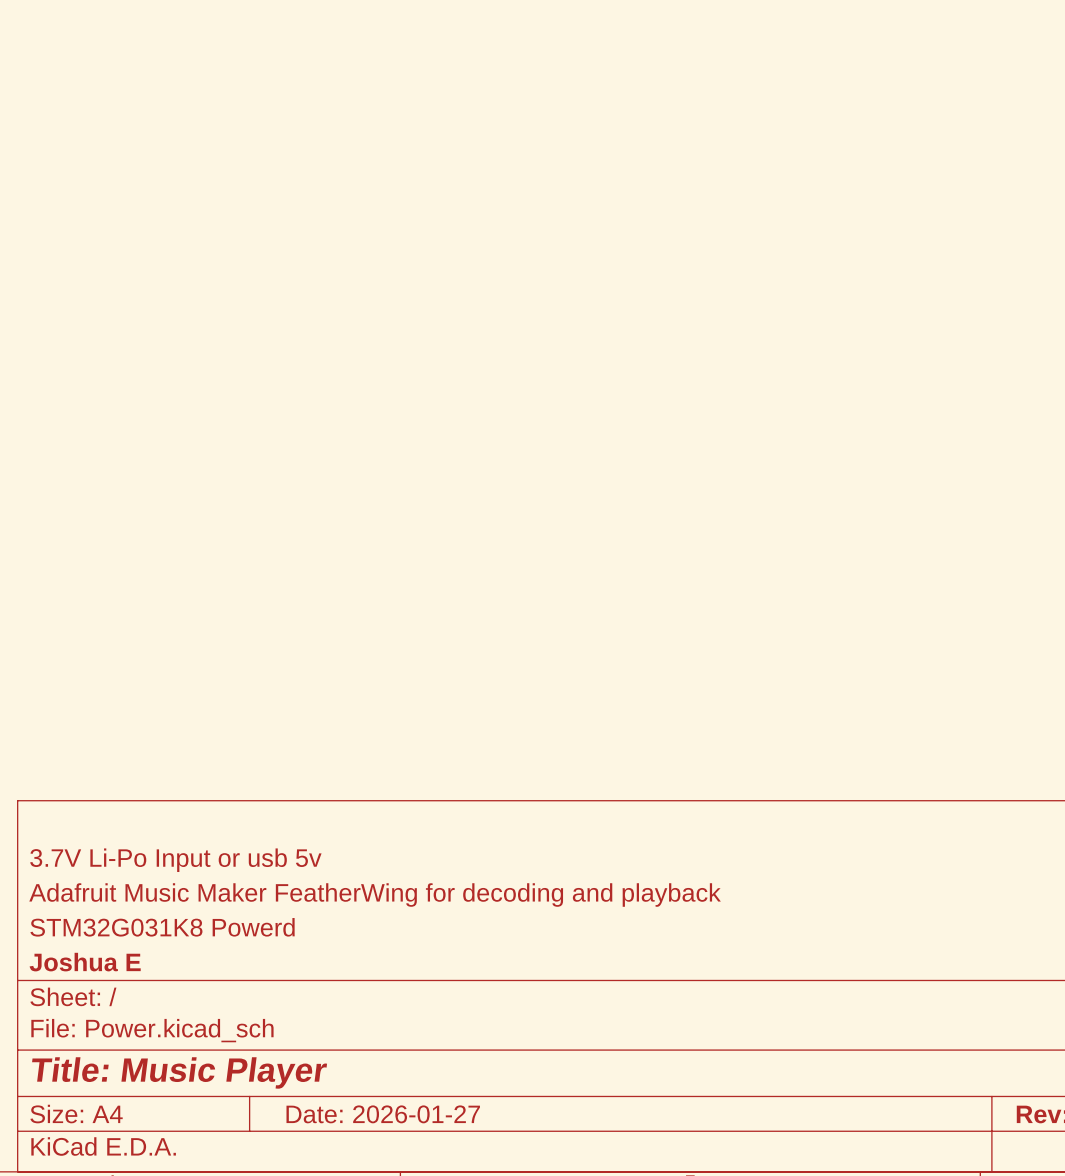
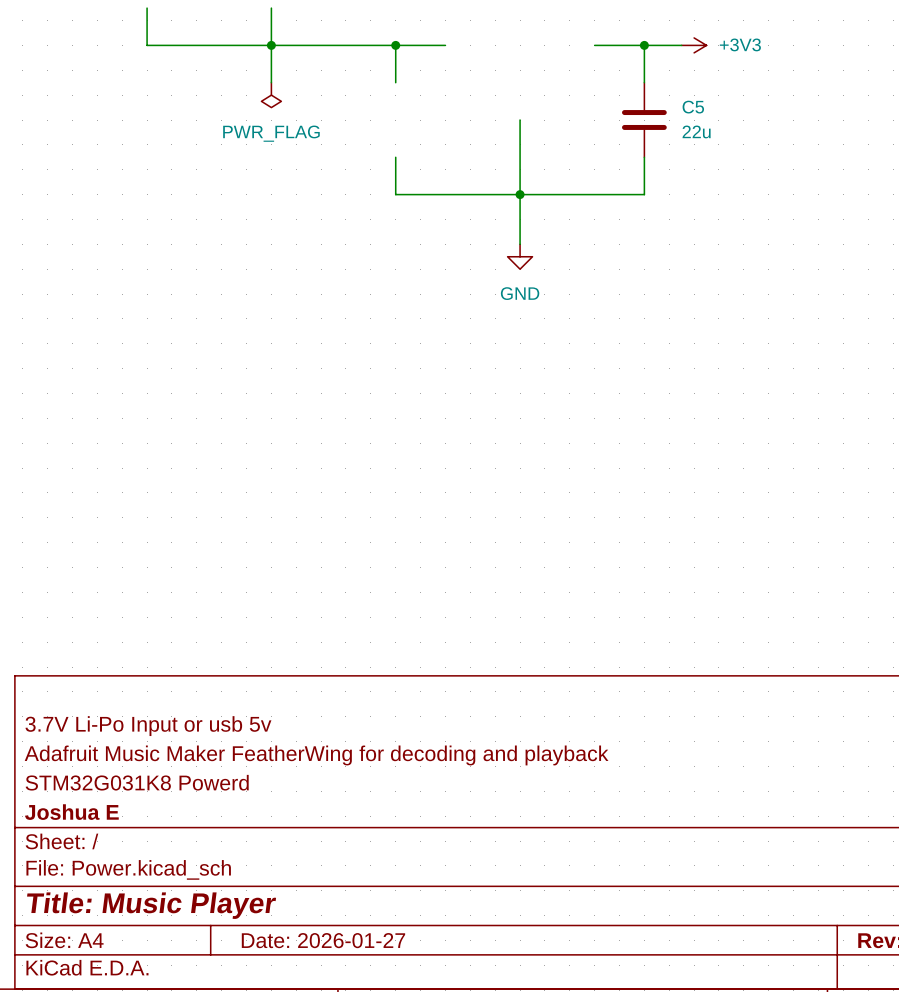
wire: none -> (147, 8) (147, 45) (445, 45)
wire: none -> (271, 8) (271, 82)
junction: none -> (271, 45)
wire: none -> (395, 45) (395, 82)
junction: none -> (395, 45)
wire: none -> (594, 45) (681, 45)
wire: none -> (644, 45) (644, 82)
junction: none -> (644, 45)
power symbol: none -> +3V3 (694, 45)
power symbol: none -> PWR_FLAG (271, 95)
wire: none -> (520, 120) (520, 244)
C5: none -> 22u (644, 120)
wire: none -> (395, 157) (395, 194) (644, 194) (644, 157)
junction: none -> (520, 194)
power symbol: none -> GND (520, 256)

